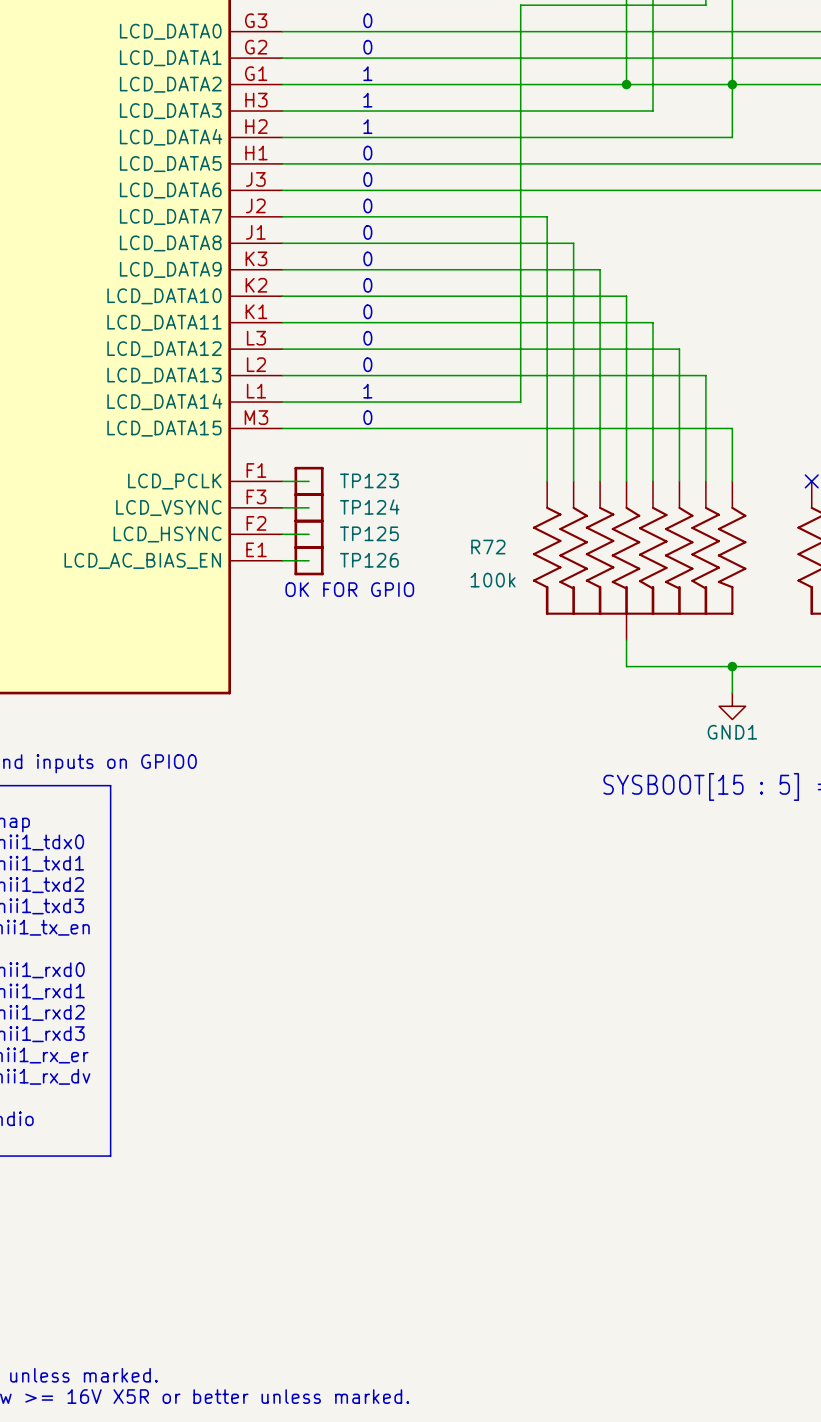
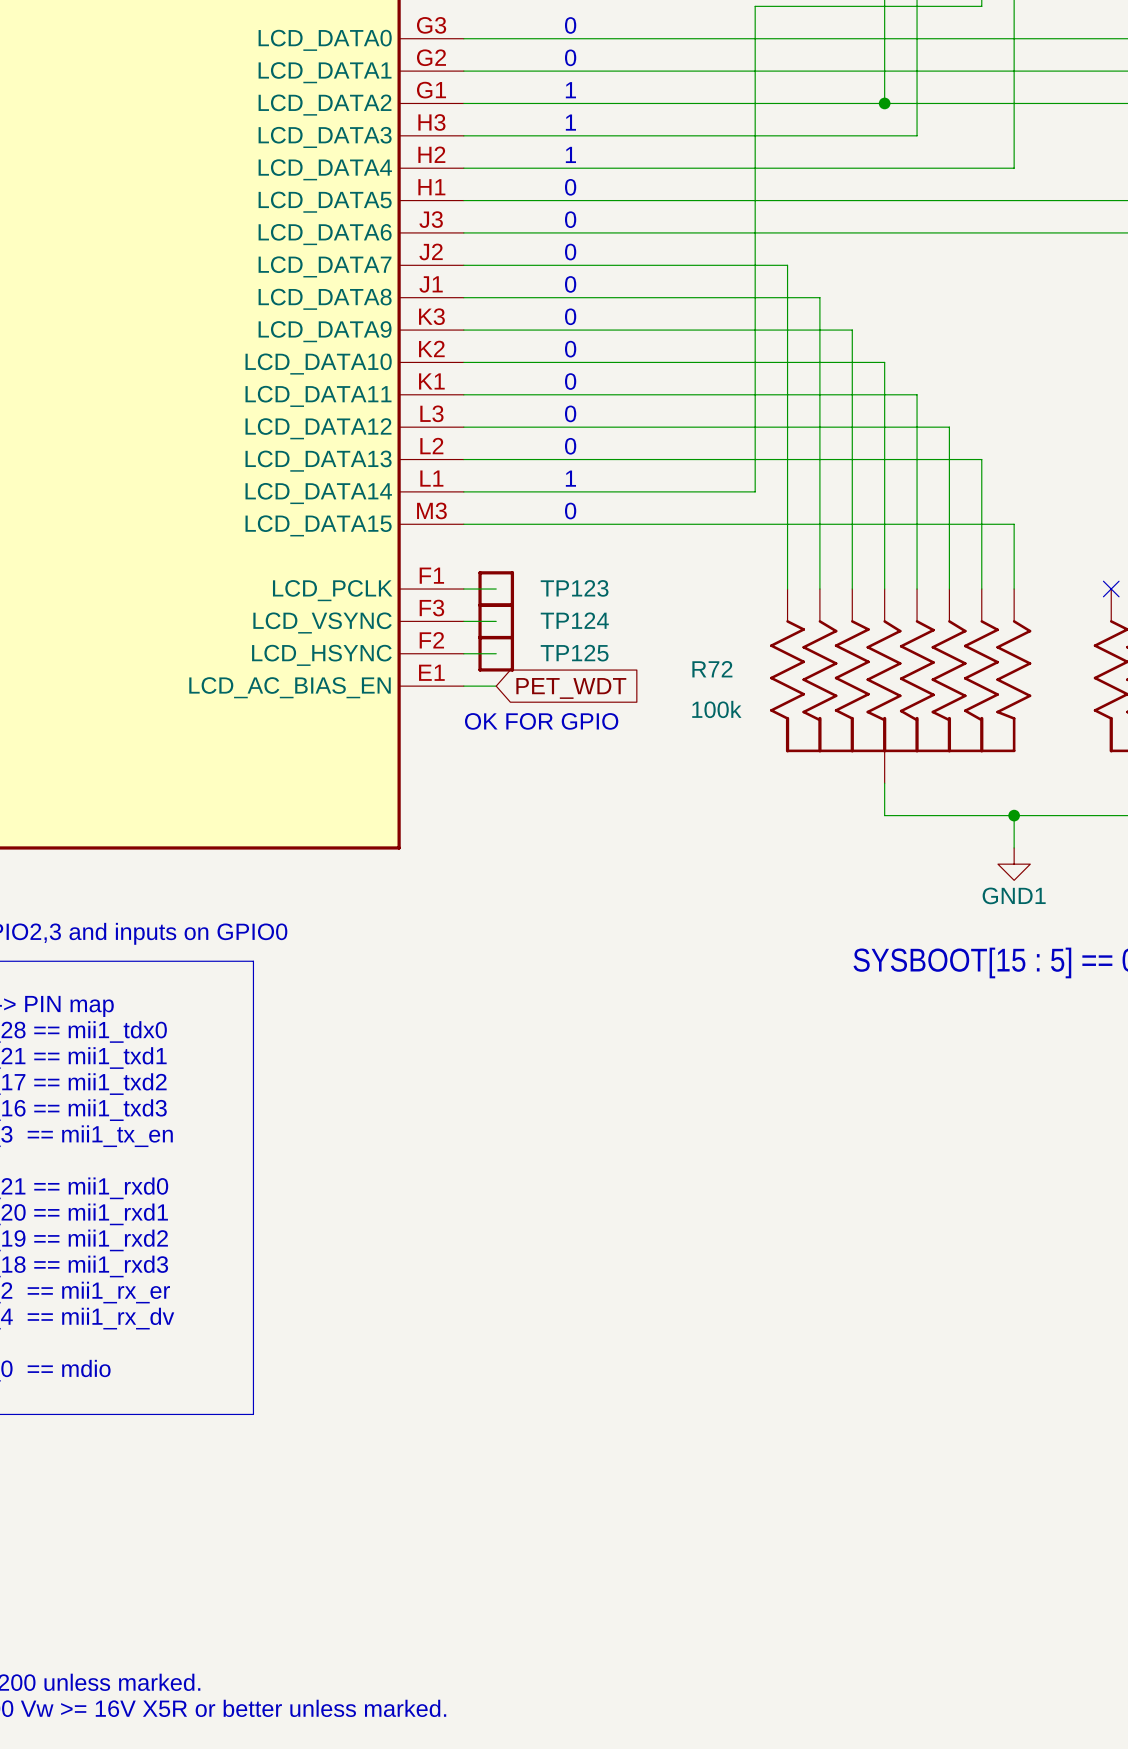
junction: (732, 84) -> none
TP126: (309, 560) -> none
global label: none -> PET_WDT (571, 688)

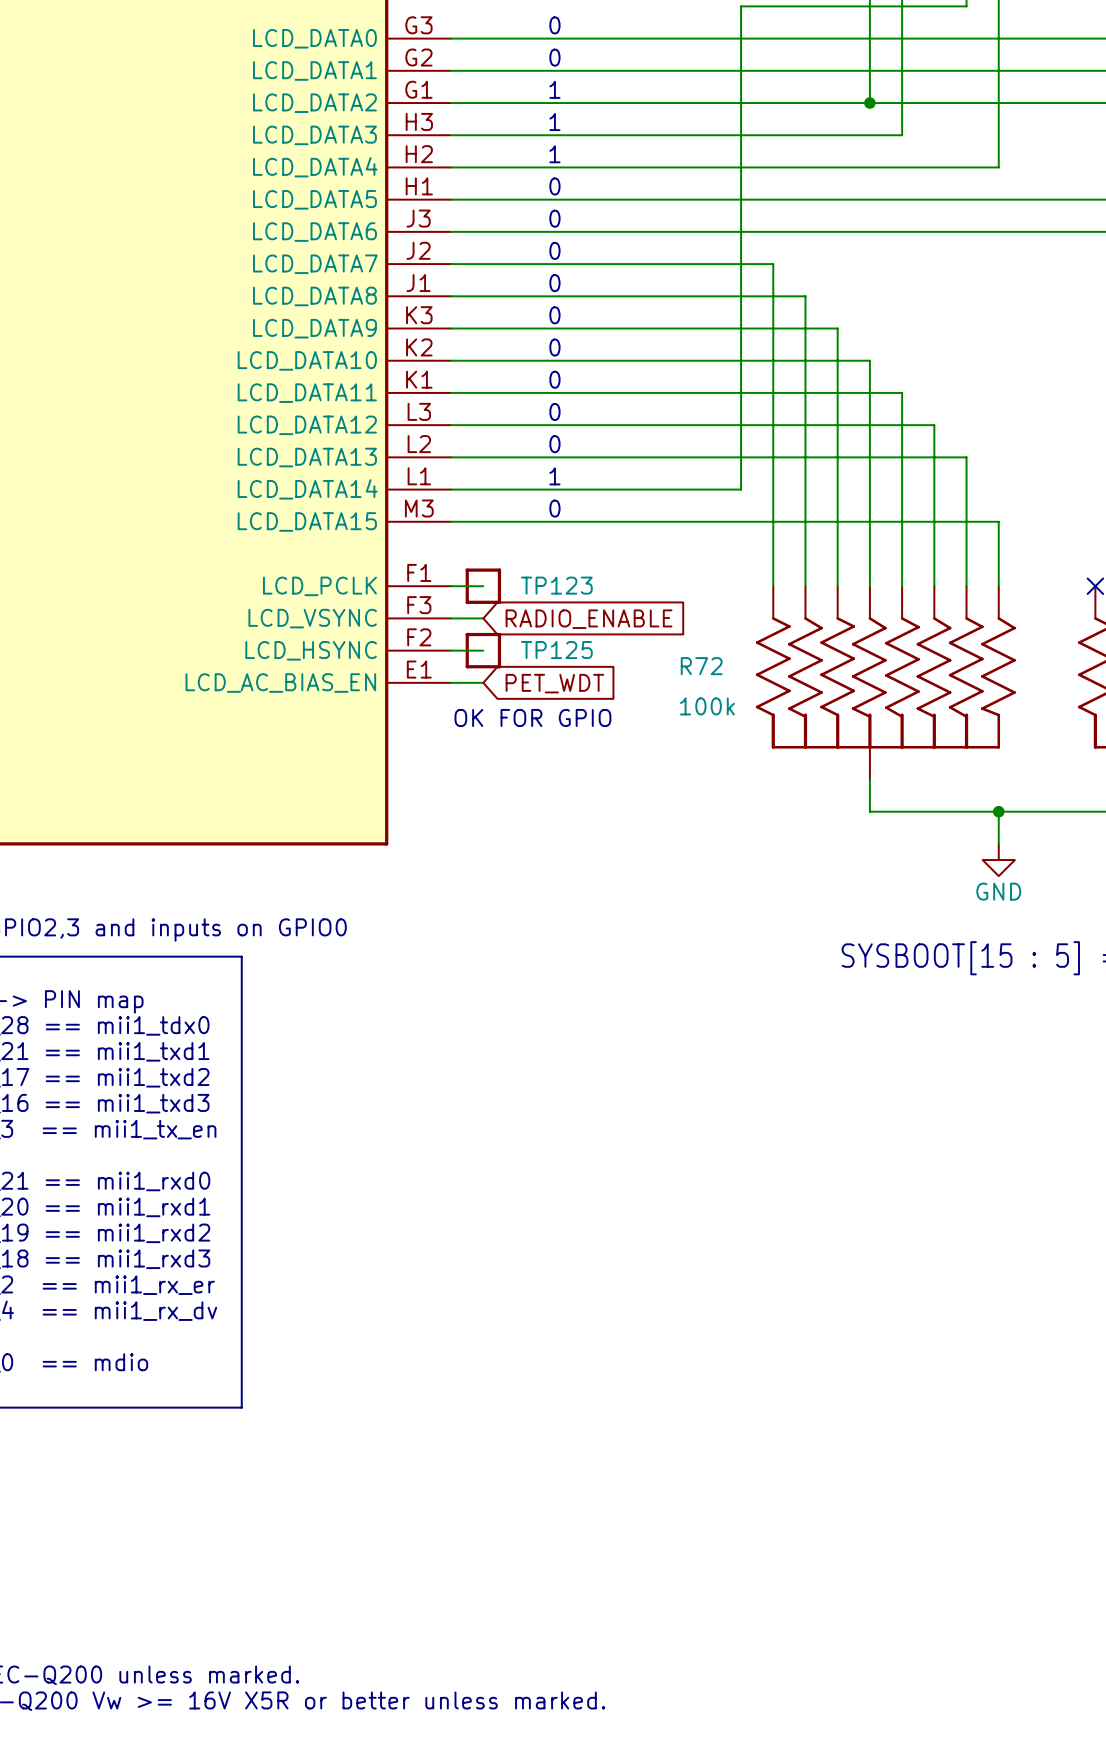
TP124: (496, 621) -> none
global label: none -> RADIO_ENABLE (589, 619)
power symbol: GND1 (1014, 864) -> GND (998, 860)

